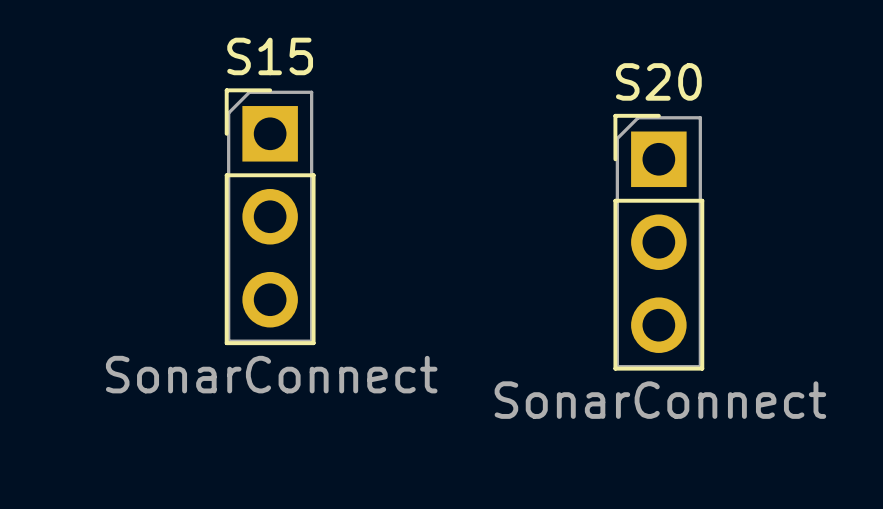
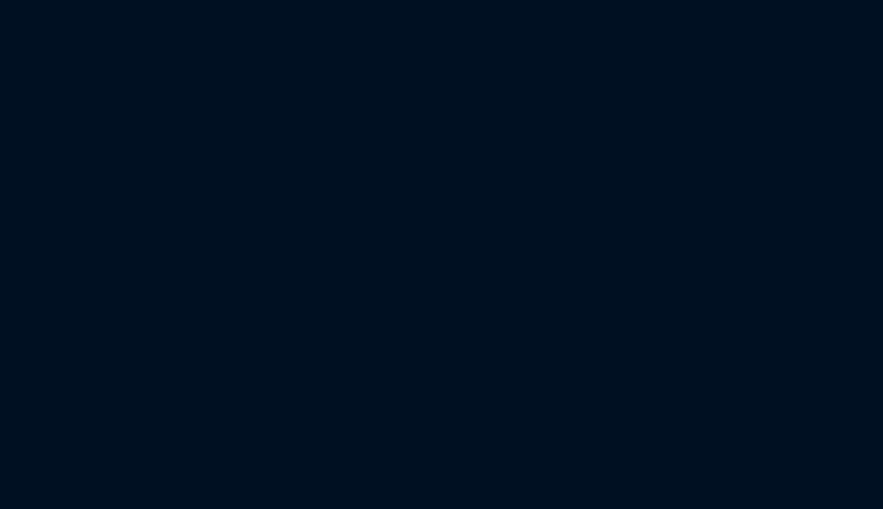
S15: SonarConnect (270, 216) -> none
S20: SonarConnect (658, 242) -> none

